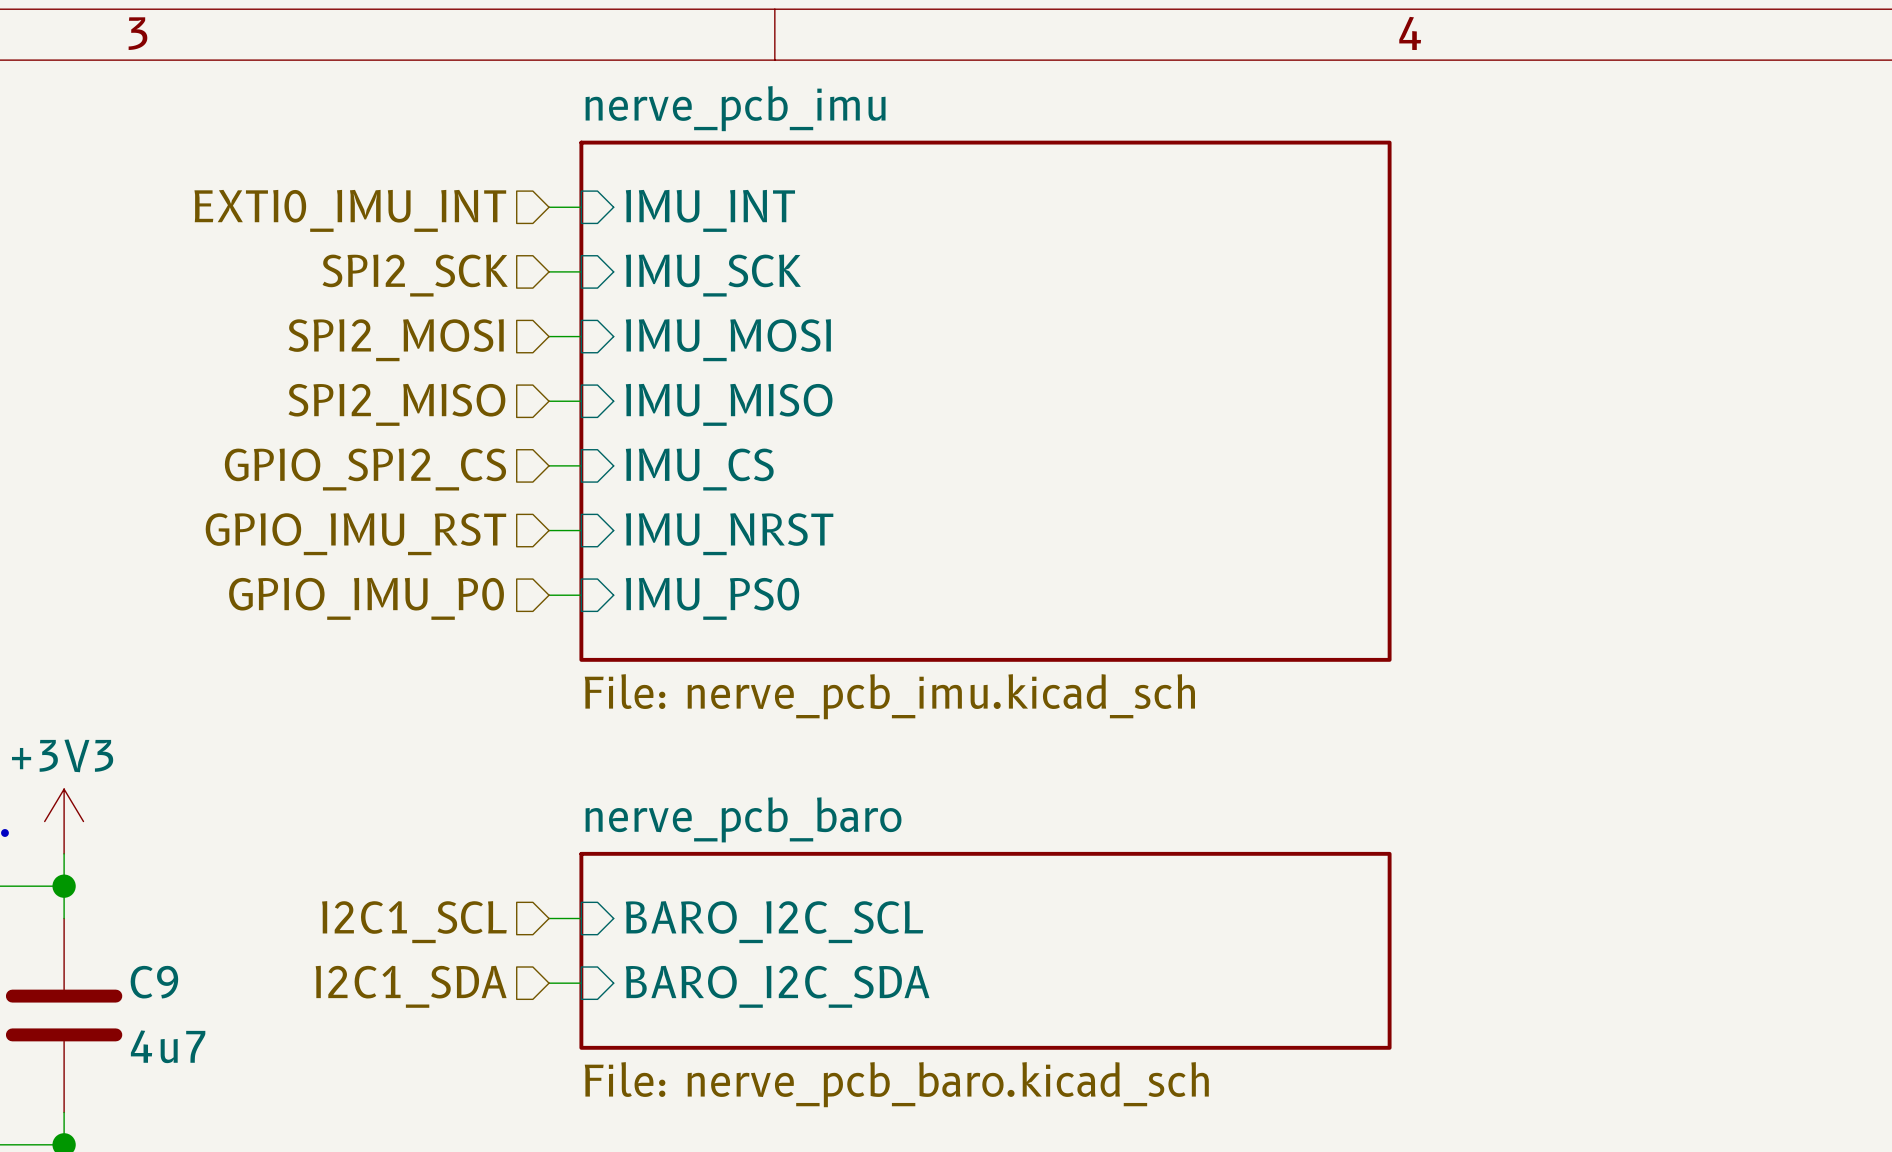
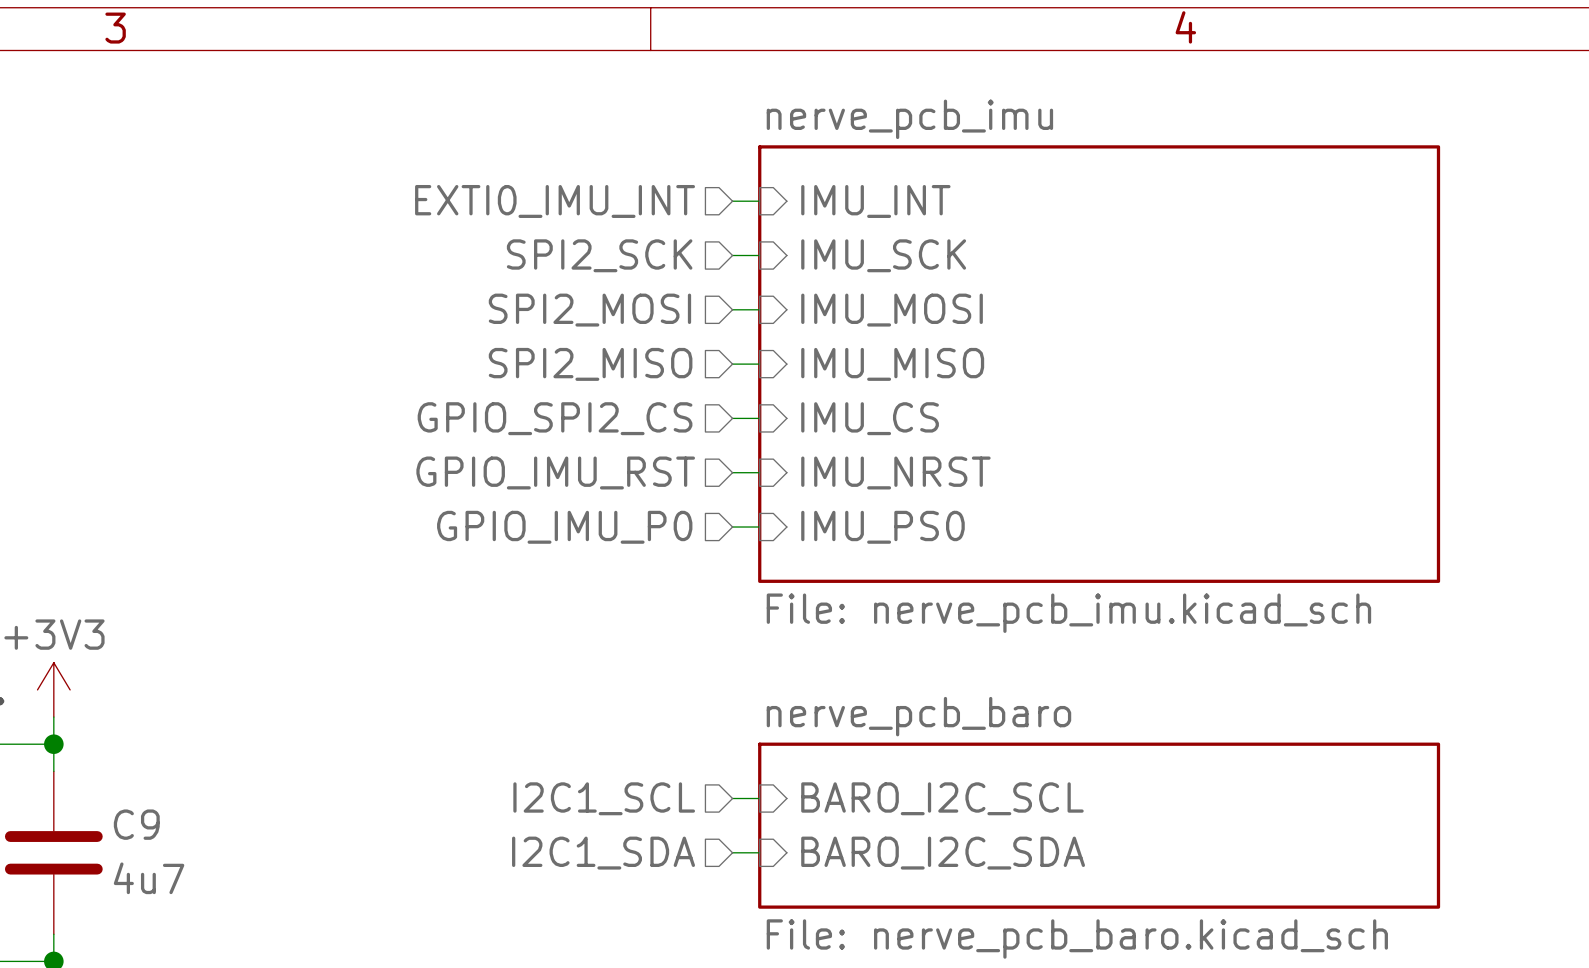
wire: (549, 207) (581, 207) -> (732, 201) (759, 201)
hierarchical label position: EXTI0_IMU_INT (350, 210) -> EXTI0_IMU_INT (555, 201)
sheet pin position: IMU_INT (710, 210) -> IMU_INT (875, 201)
wire: (549, 271) (581, 271) -> (732, 255) (759, 255)
hierarchical label position: SPI2_SCK (415, 275) -> SPI2_SCK (599, 255)
sheet pin position: IMU_SCK (713, 275) -> IMU_SCK (883, 255)
wire: (549, 336) (581, 336) -> (732, 309) (759, 309)
hierarchical label position: SPI2_MOSI (396, 340) -> SPI2_MOSI (589, 310)
sheet pin position: IMU_MOSI (728, 340) -> IMU_MOSI (892, 310)
wire: (549, 401) (581, 401) -> (732, 364) (759, 364)
sheet nerve_pcb_imu position: (985, 401) -> (1099, 364)
hierarchical label position: SPI2_MISO (396, 404) -> SPI2_MISO (590, 364)
sheet pin position: IMU_MISO (729, 404) -> IMU_MISO (892, 364)
wire: (549, 465) (581, 465) -> (732, 418) (759, 418)
hierarchical label position: GPIO_SPI2_CS (365, 469) -> GPIO_SPI2_CS (555, 418)
sheet pin position: IMU_CS (699, 469) -> IMU_CS (870, 418)
wire: (549, 530) (581, 530) -> (732, 472) (759, 472)
hierarchical label position: GPIO_IMU_RST (355, 534) -> GPIO_IMU_RST (555, 472)
sheet pin position: IMU_NRST (729, 534) -> IMU_NRST (895, 472)
wire: (549, 595) (581, 595) -> (732, 527) (759, 527)
hierarchical label position: GPIO_IMU_P0 (366, 598) -> GPIO_IMU_P0 (564, 527)
sheet pin position: IMU_PS0 (712, 598) -> IMU_PS0 (882, 527)
wire: (549, 918) (581, 918) -> (732, 798) (759, 798)
hierarchical label position: I2C1_SCL (414, 922) -> I2C1_SCL (604, 798)
sheet pin position: BARO_I2C_SCL (774, 922) -> BARO_I2C_SCL (942, 798)
sheet nerve_pcb_baro position: (985, 950) -> (1099, 825)
wire: (549, 983) (581, 983) -> (732, 852) (759, 852)
hierarchical label position: I2C1_SDA (411, 986) -> I2C1_SDA (603, 853)
sheet pin position: BARO_I2C_SDA (777, 986) -> BARO_I2C_SDA (943, 853)

